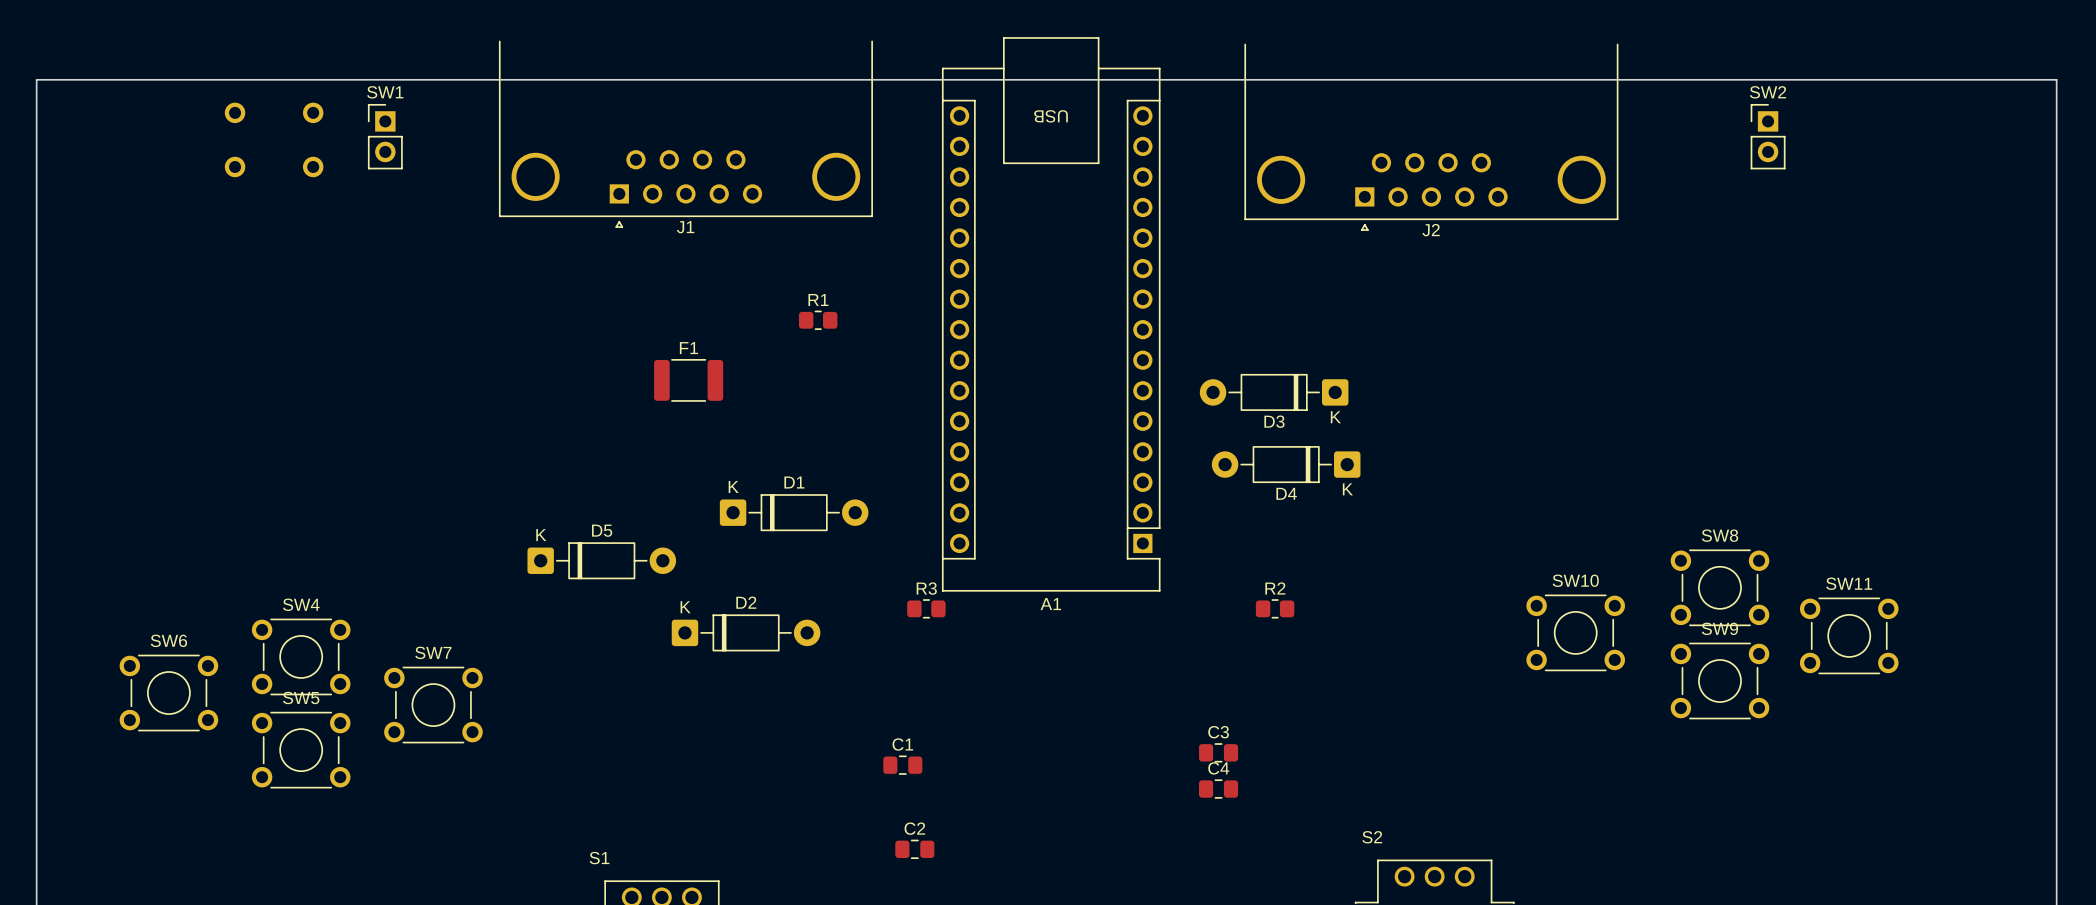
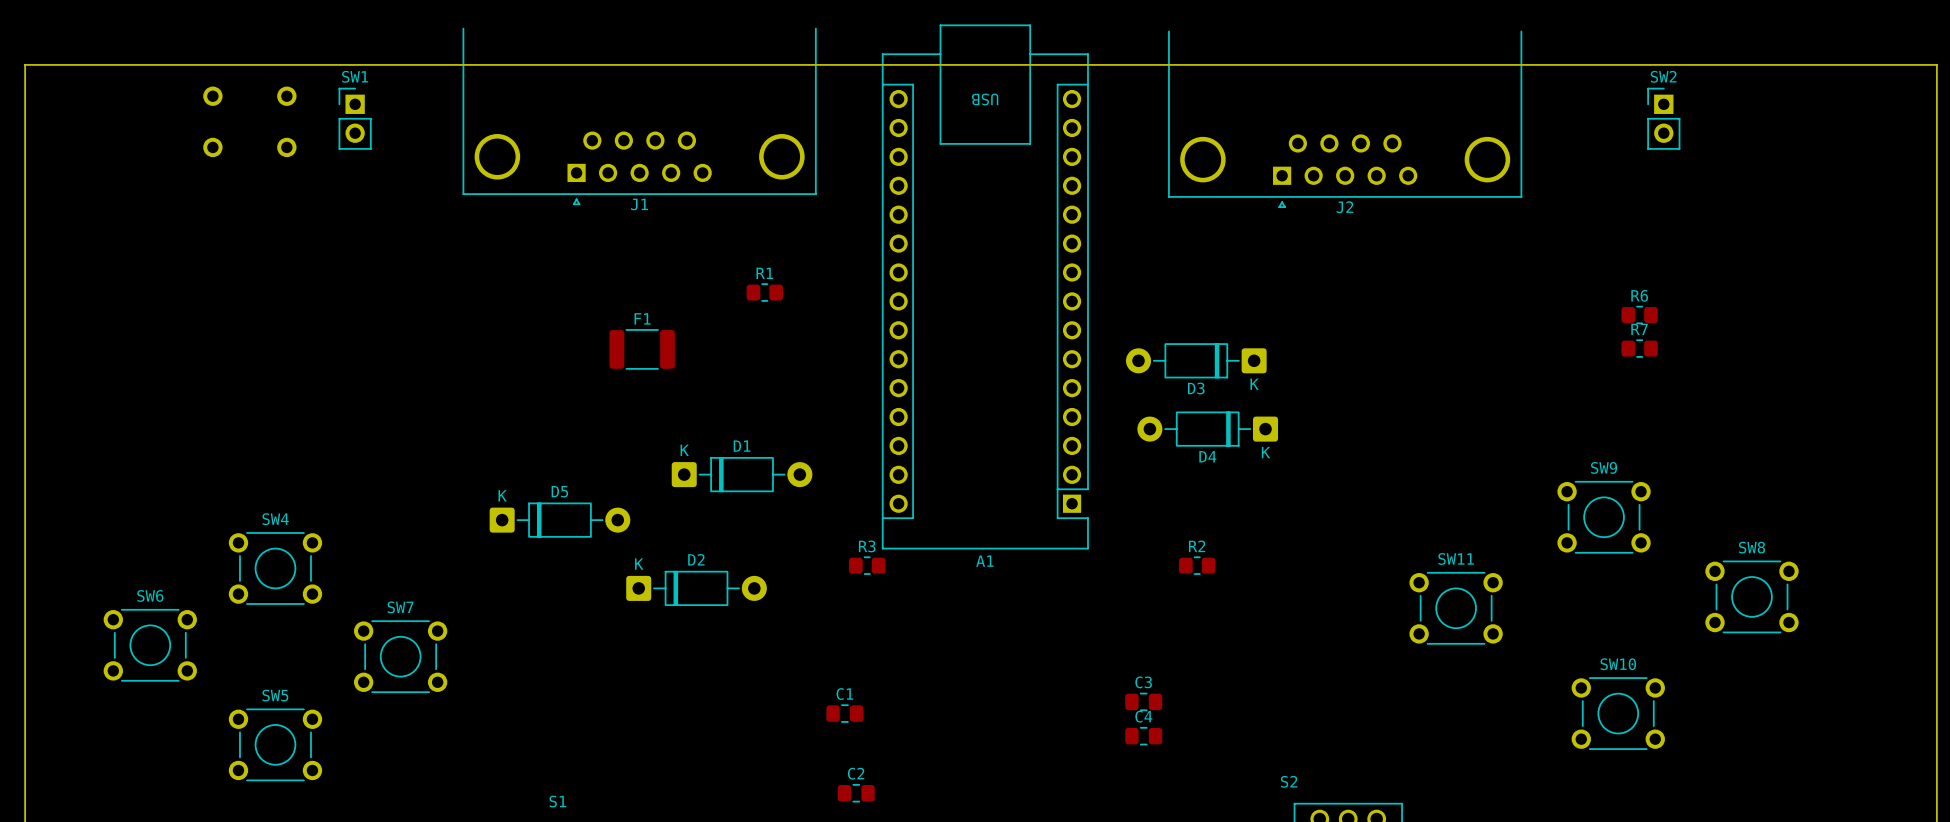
R6: none -> (1639, 315)
R7: none -> (1639, 348)
SW8 position: (1719, 587) -> (1751, 596)
SW10 position: (1575, 632) -> (1618, 713)
SW11 position: (1849, 635) -> (1456, 608)
SW4 position: (301, 656) -> (275, 568)
SW9 position: (1719, 681) -> (1604, 517)
SW5 position: (301, 750) -> (275, 744)

